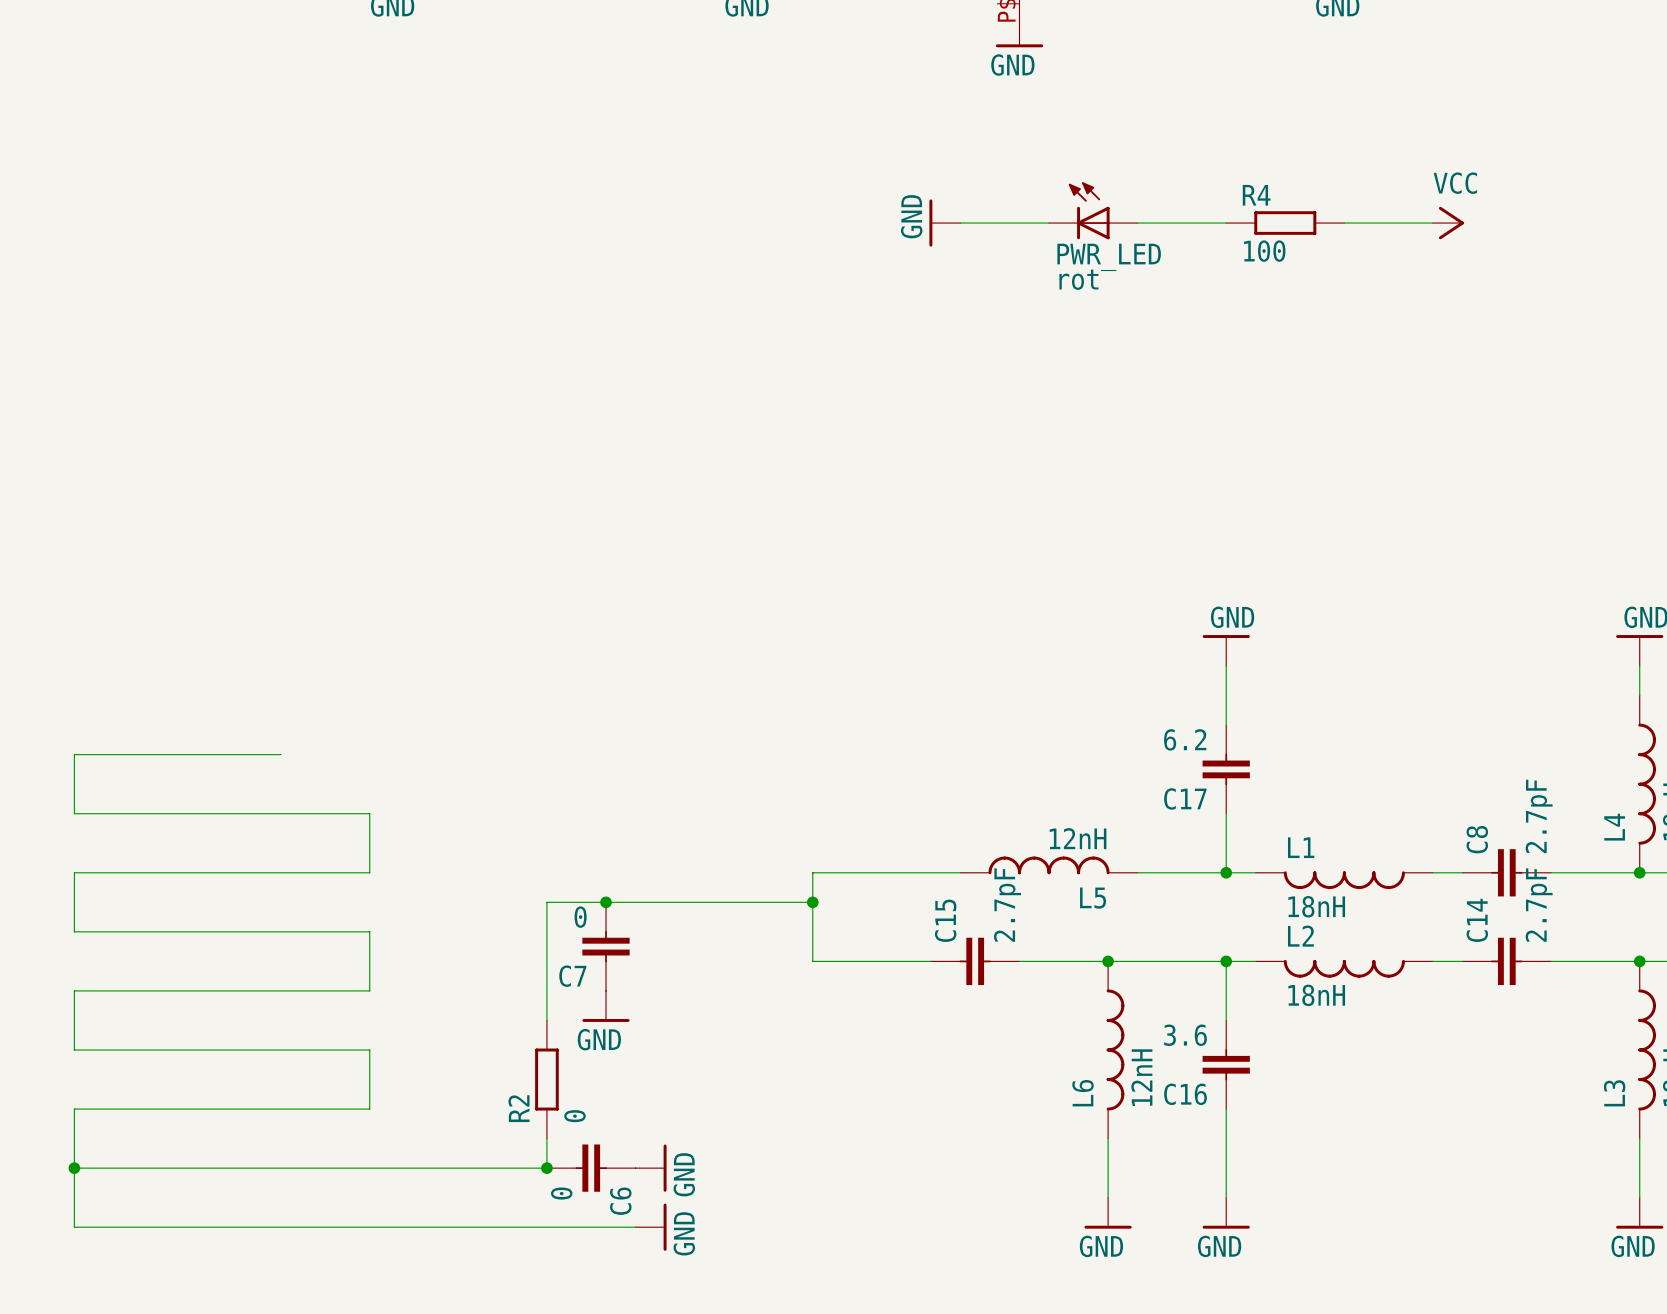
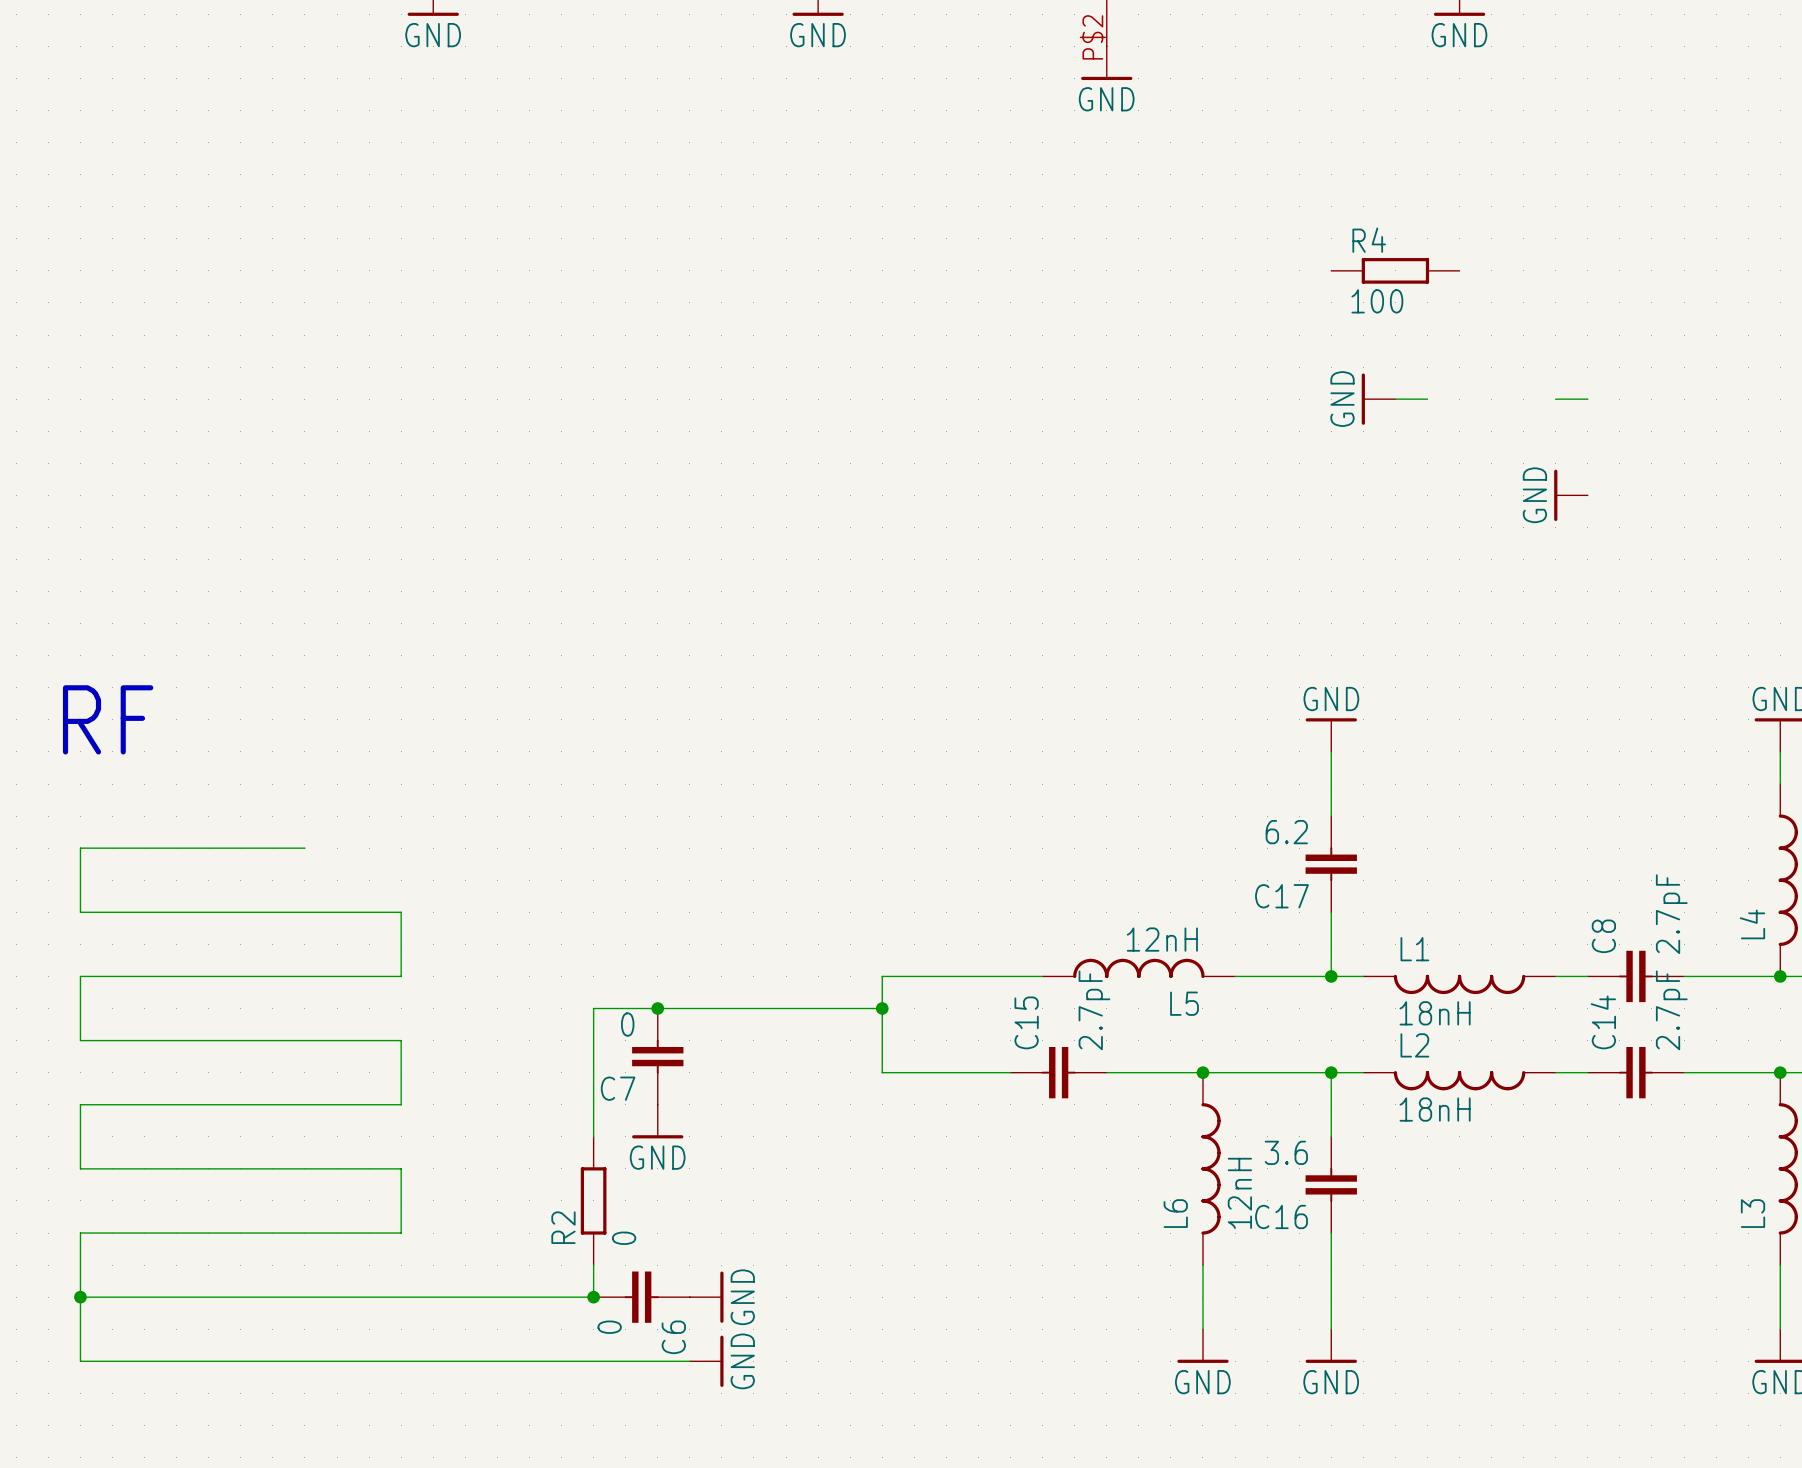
PWR_LED: rot (1093, 210) -> none
power symbol: GND (944, 223) -> none
wire: (960, 223) (1049, 223) -> none
wire: (1137, 223) (1226, 223) -> none
wire: (1344, 223) (1432, 223) -> none
power symbol: VCC (1448, 223) -> none
power symbol: none -> GND (1378, 399)
wire: none -> (1395, 399) (1427, 399)
wire: none -> (1555, 399) (1587, 399)
power symbol: none -> GND (1571, 495)
text: none -> RF (108, 719)

